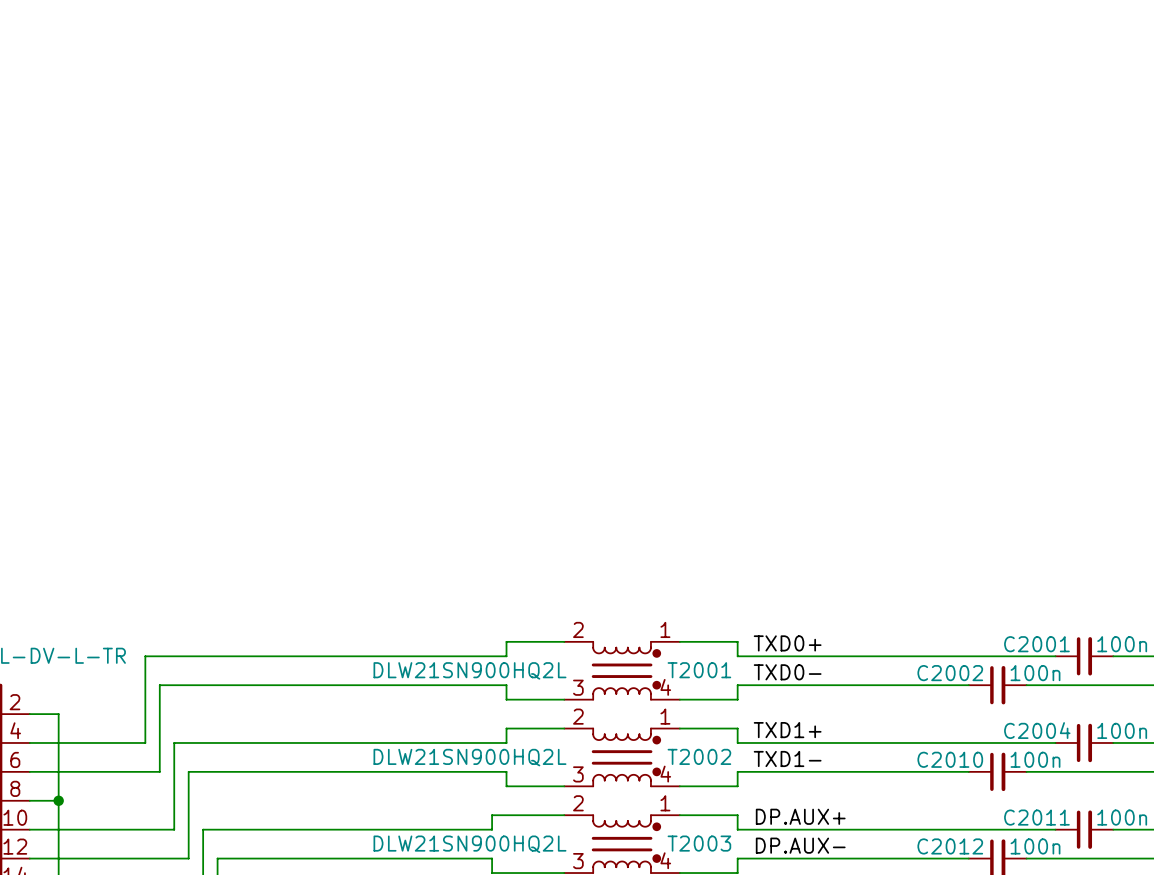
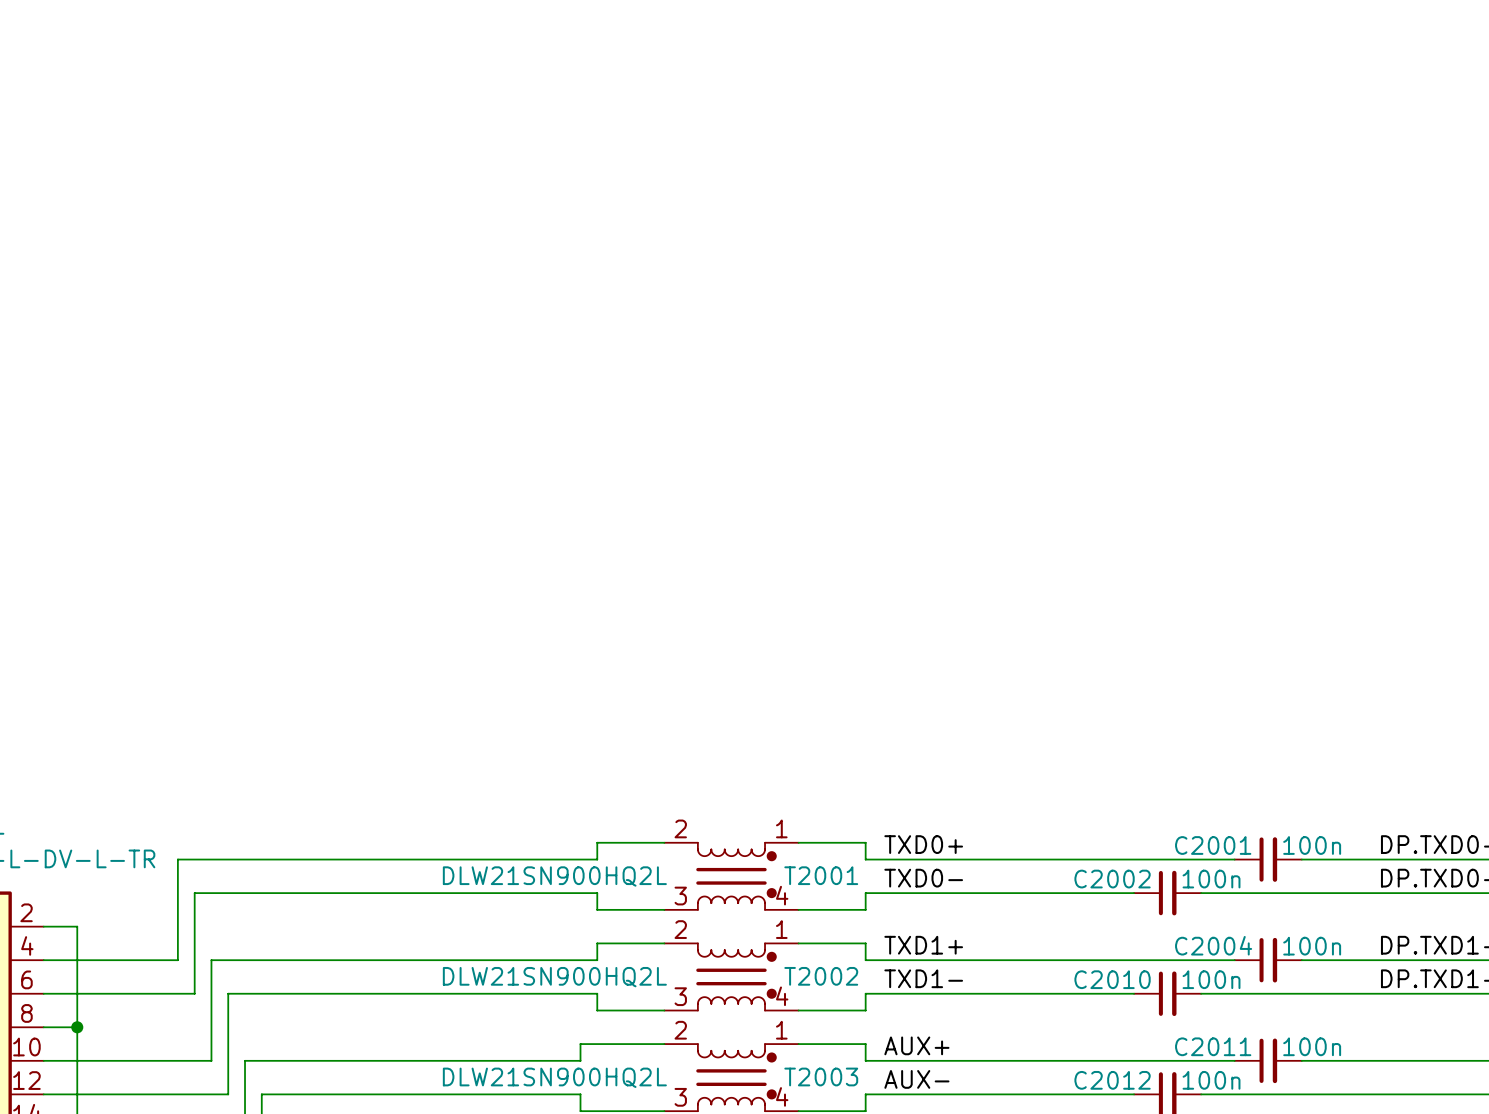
label: DP.AUX+ (800, 816) -> AUX+ (916, 1045)
label: DP.AUX- (800, 845) -> AUX- (916, 1079)

